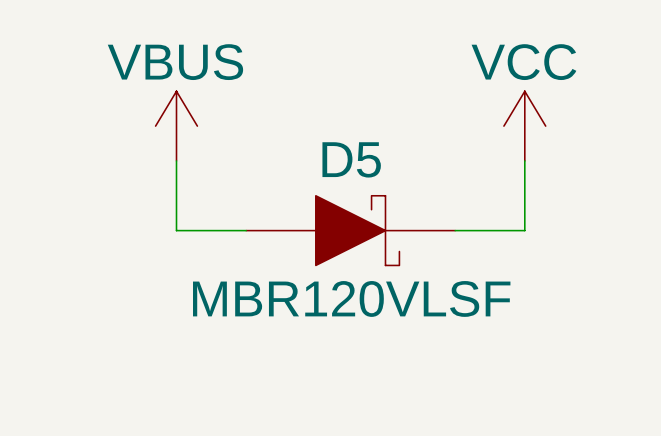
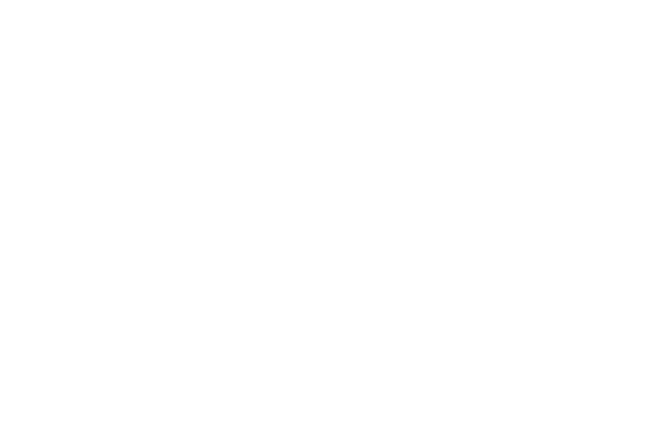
power symbol: VBUS (176, 126) -> none
power symbol: VCC (524, 126) -> none
wire: (176, 160) (176, 230) (246, 230) -> none
wire: (524, 160) (524, 230) (455, 230) -> none
D5: MBR120VLSF (350, 230) -> none

